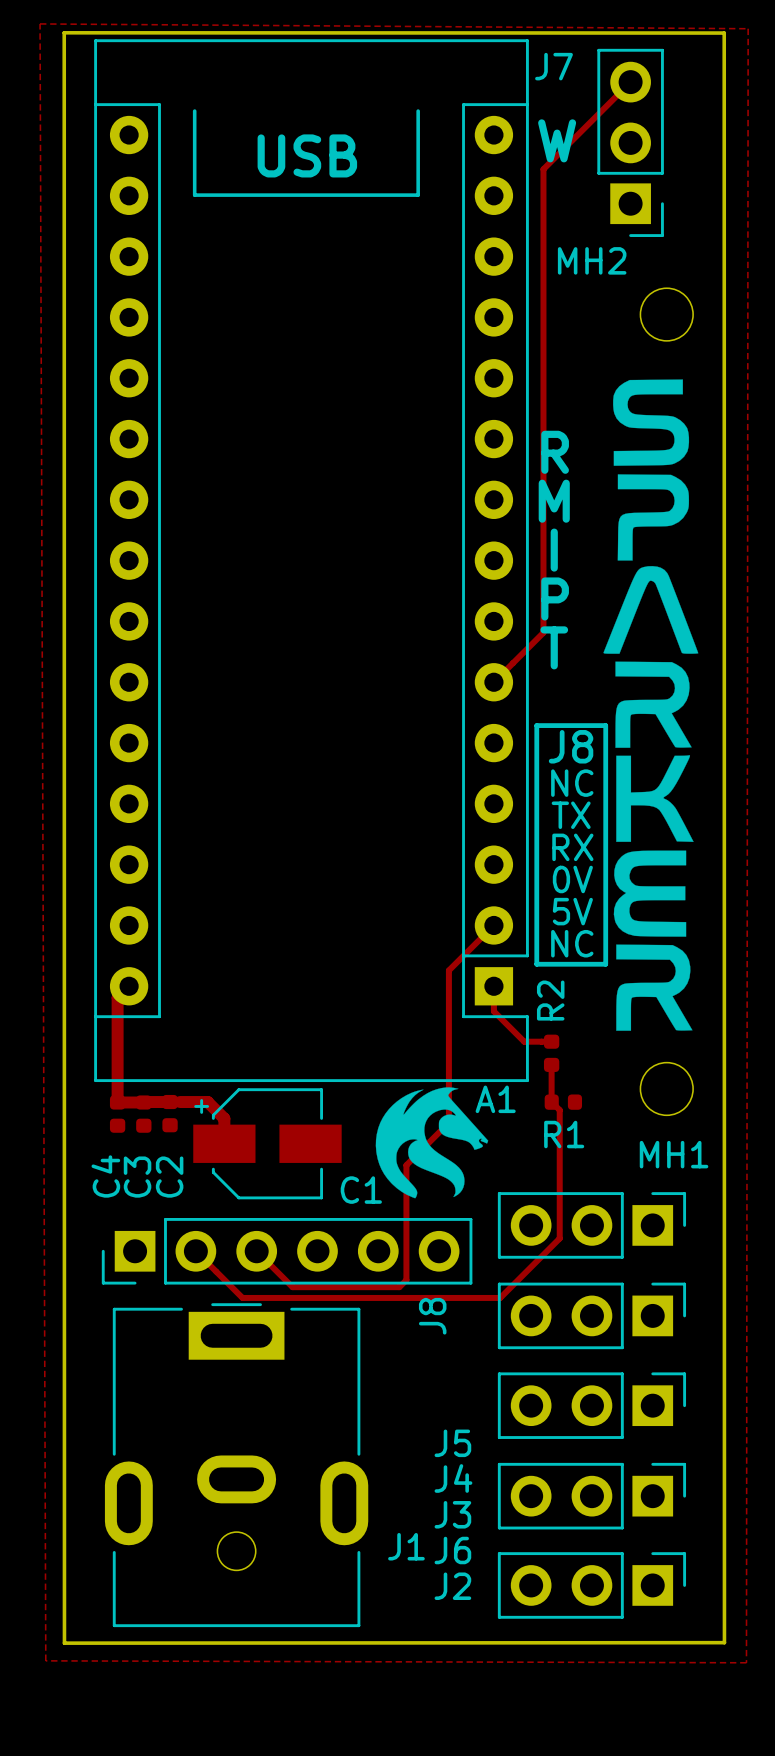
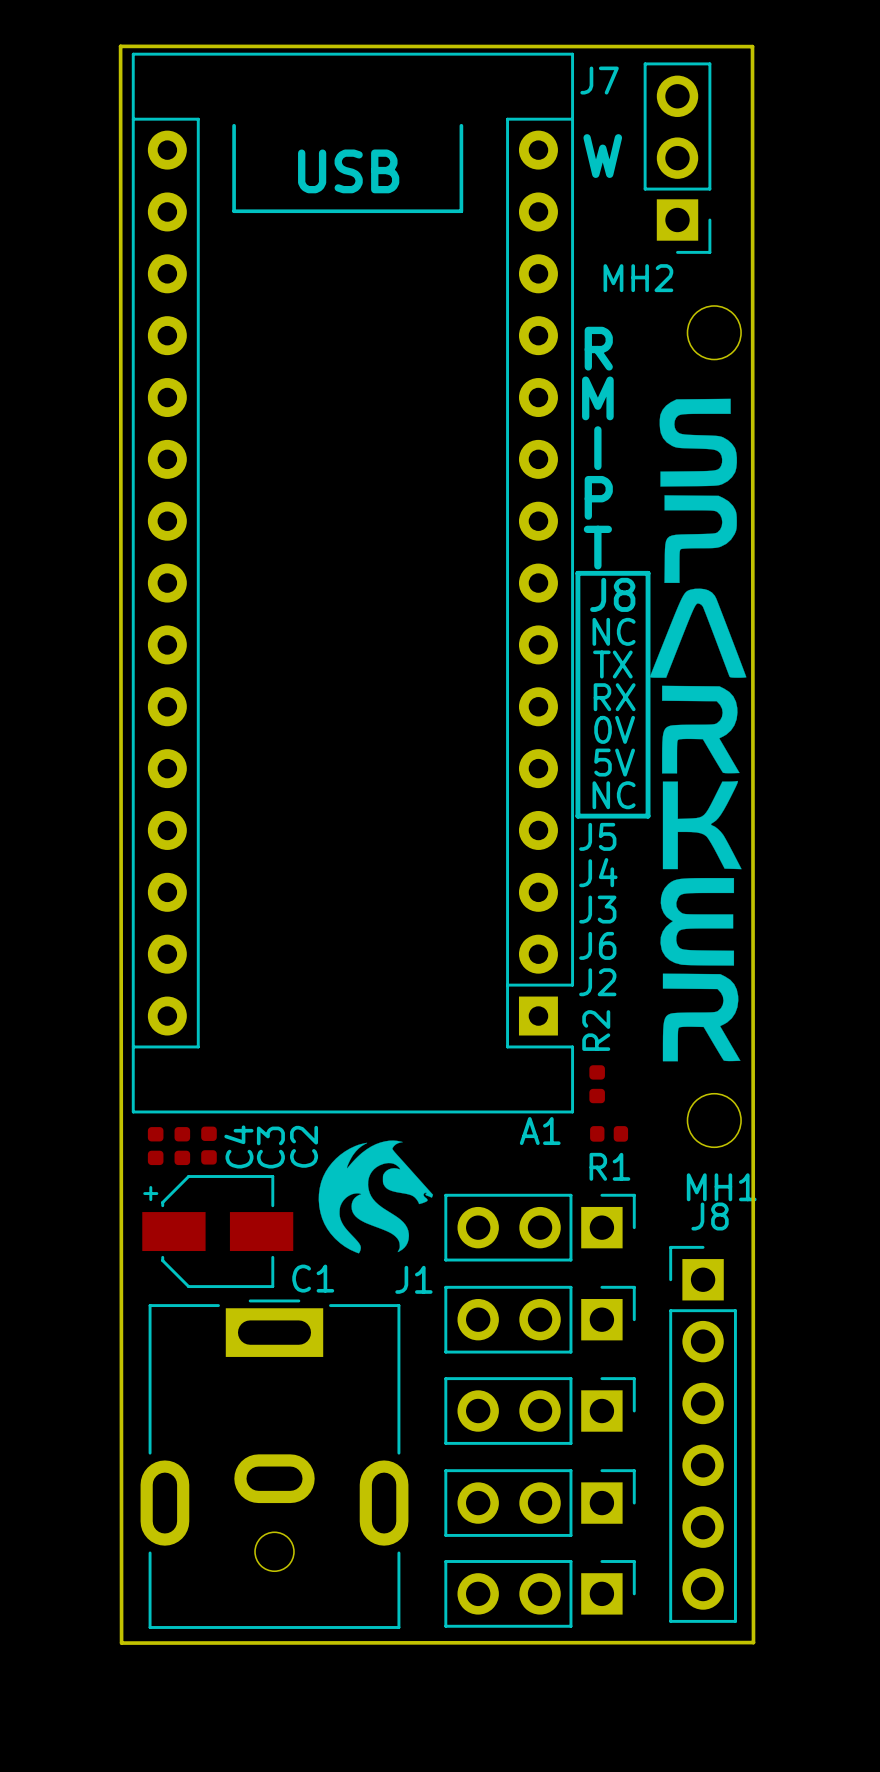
zone outline: (40, 23) (748, 28) (746, 1662) (45, 1660) (40, 23) -> none
board edge: (64, 32) (64, 1643) (724, 1642) (724, 33) (64, 32) -> (121, 1642) (120, 46) (752, 46) (753, 1642) (121, 1643)
track: (630, 82) (543, 169) (543, 632) (493, 682) -> none
text position: R (555, 452) -> R (598, 348)
text position: M (554, 501) -> M (597, 398)
text position: I (554, 550) -> I (597, 448)
text position: P (555, 598) -> P (598, 497)
text position: T (554, 647) -> T (597, 547)
line: (536, 725) (536, 964) (605, 964) (605, 725) (536, 725) -> (577, 573) (577, 816) (648, 816) (648, 573) (577, 573)
text position: J8 (571, 746) -> J8 (612, 594)
text position: NC (572, 783) -> NC (614, 795)
text position: TX (571, 815) -> TX (612, 664)
text position: RX (572, 847) -> RX (614, 697)
text position: 0V (572, 879) -> 0V (614, 729)
text position: 5V (572, 911) -> 5V (614, 762)
track: (493, 925) (448, 970) (448, 1122) (406, 1165) (406, 1280) (399, 1287) (292, 1287) (256, 1251) -> none
text position: NC (572, 943) -> NC (614, 631)
track: (129, 986) (117, 997) (117, 1102) (207, 1102) (224, 1118) (224, 1143) -> none
track: (493, 986) (493, 1011) (524, 1041) (551, 1041) -> none
track: (551, 1064) (551, 1102) (559, 1110) (559, 1238) (500, 1297) (242, 1297) (195, 1251) -> none
drawing position: (432, 1142) -> (375, 1196)
C1 position: (267, 1143) -> (217, 1231)
C4 name position: C4 (105, 1176) -> C4 (238, 1146)
C3 name position: C3 (137, 1177) -> C3 (270, 1147)
C2 name position: C2 (169, 1177) -> C2 (304, 1146)
J5 position: (591, 1225) -> (540, 1227)
J8 rotation: 0° (287, 1251) -> 90° clockwise (703, 1434)
J8 position: (287, 1251) -> (703, 1434)
J4 position: (591, 1315) -> (540, 1319)
J8 name position: J8 (432, 1316) -> J8 (710, 1216)
J3 position: (591, 1405) -> (540, 1411)
J5 name position: J5 (452, 1443) -> J5 (597, 836)
J1 position: (236, 1465) -> (274, 1464)
J4 name position: J4 (453, 1478) -> J4 (598, 872)
J6 position: (591, 1496) -> (540, 1503)
J3 name position: J3 (452, 1514) -> J3 (597, 909)
J1 name position: J1 (406, 1546) -> J1 (413, 1279)
J6 name position: J6 (452, 1550) -> J6 (597, 945)
J2 position: (591, 1585) -> (540, 1593)
J2 name position: J2 (452, 1586) -> J2 (597, 982)

